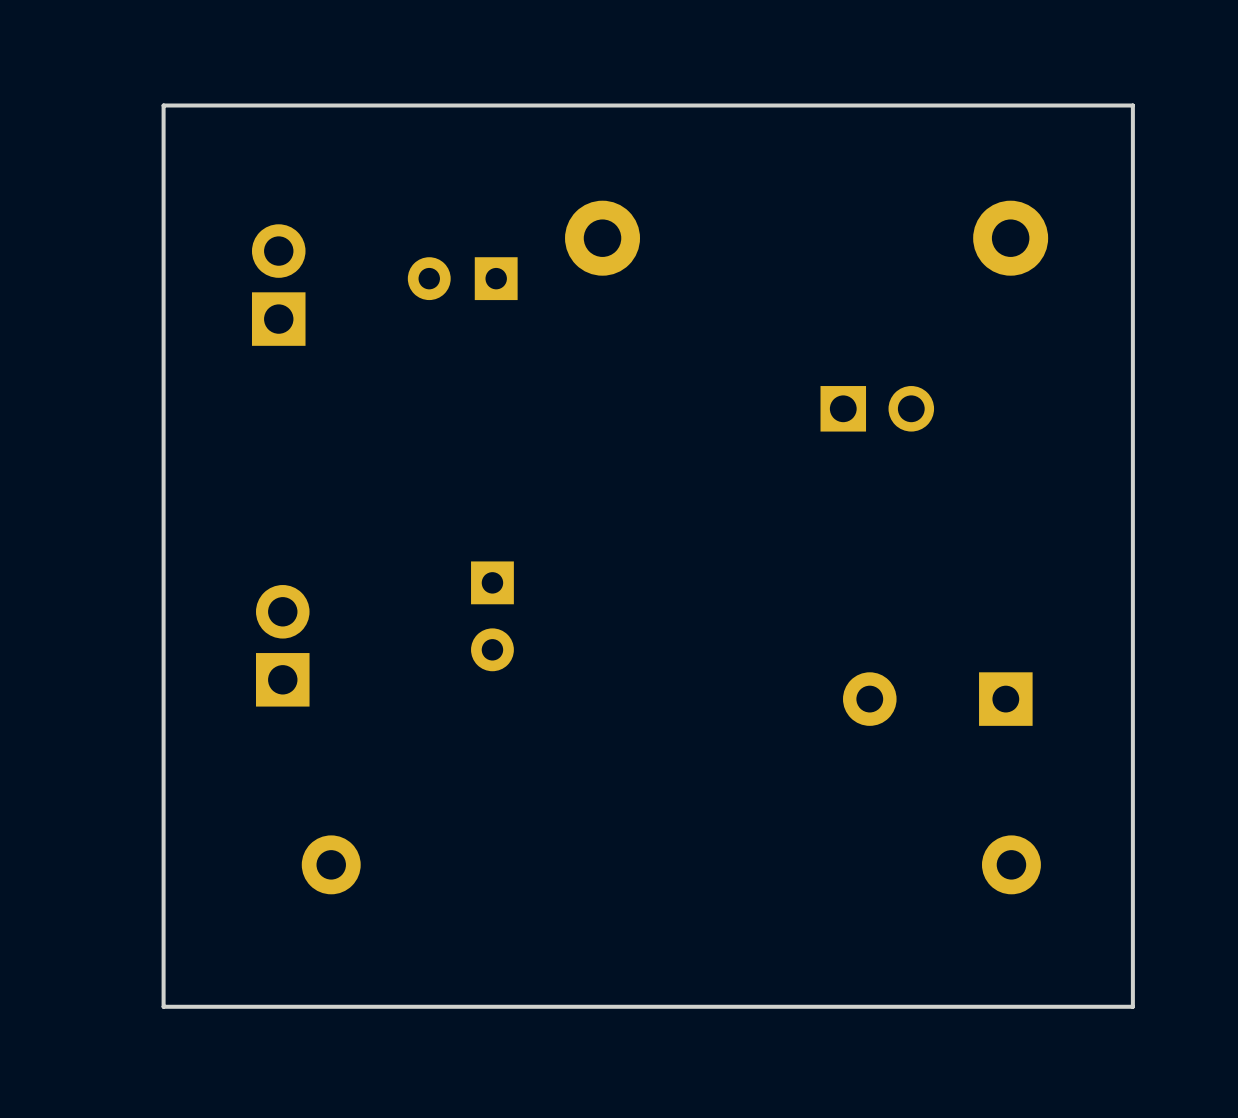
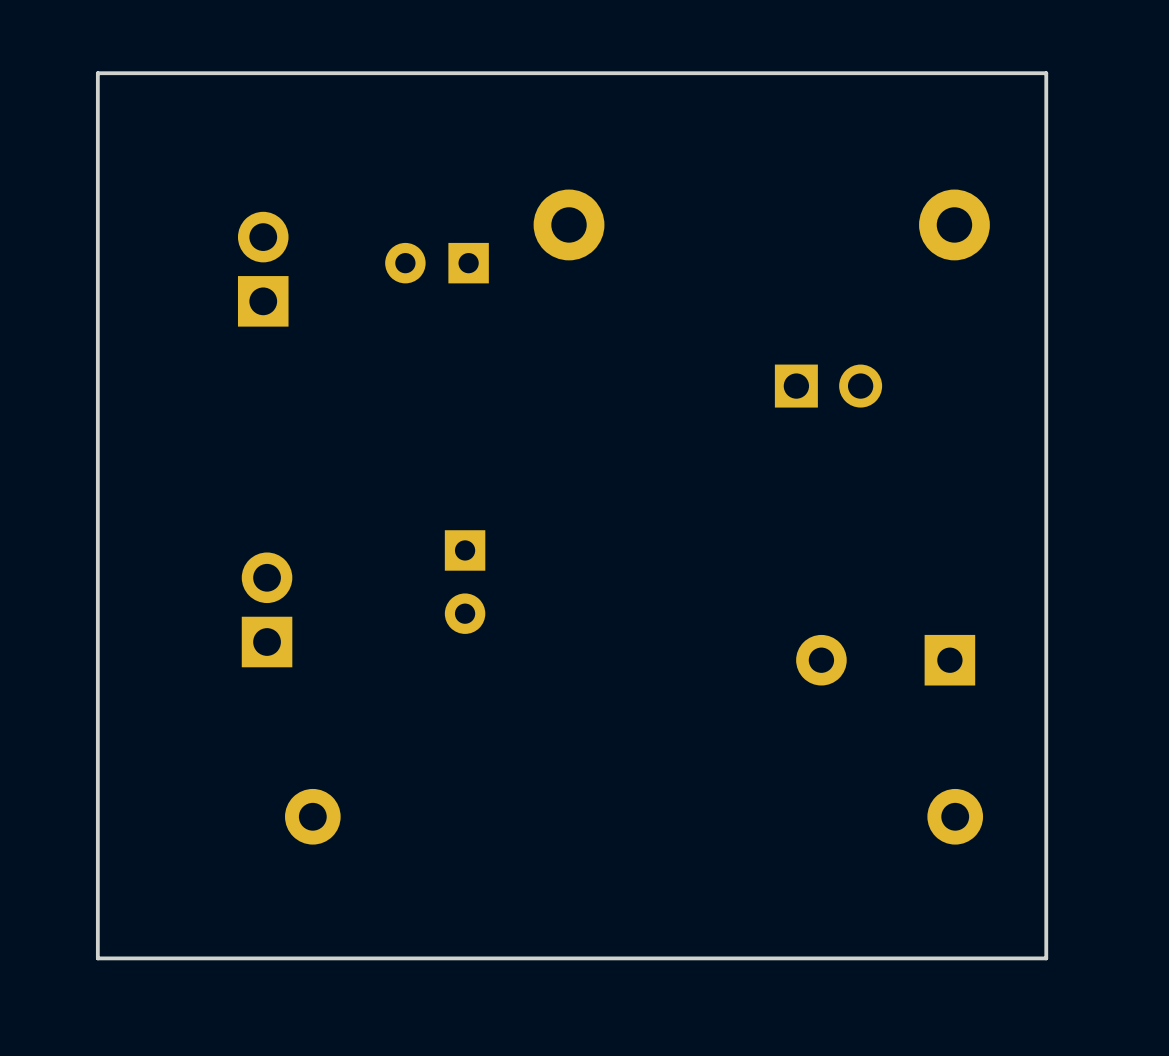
board edge: (1132, 105) (163, 105) (163, 1006) (1132, 1006) (1132, 105) -> (1046, 73) (1046, 958) (97, 958) (97, 73) (1046, 73)

